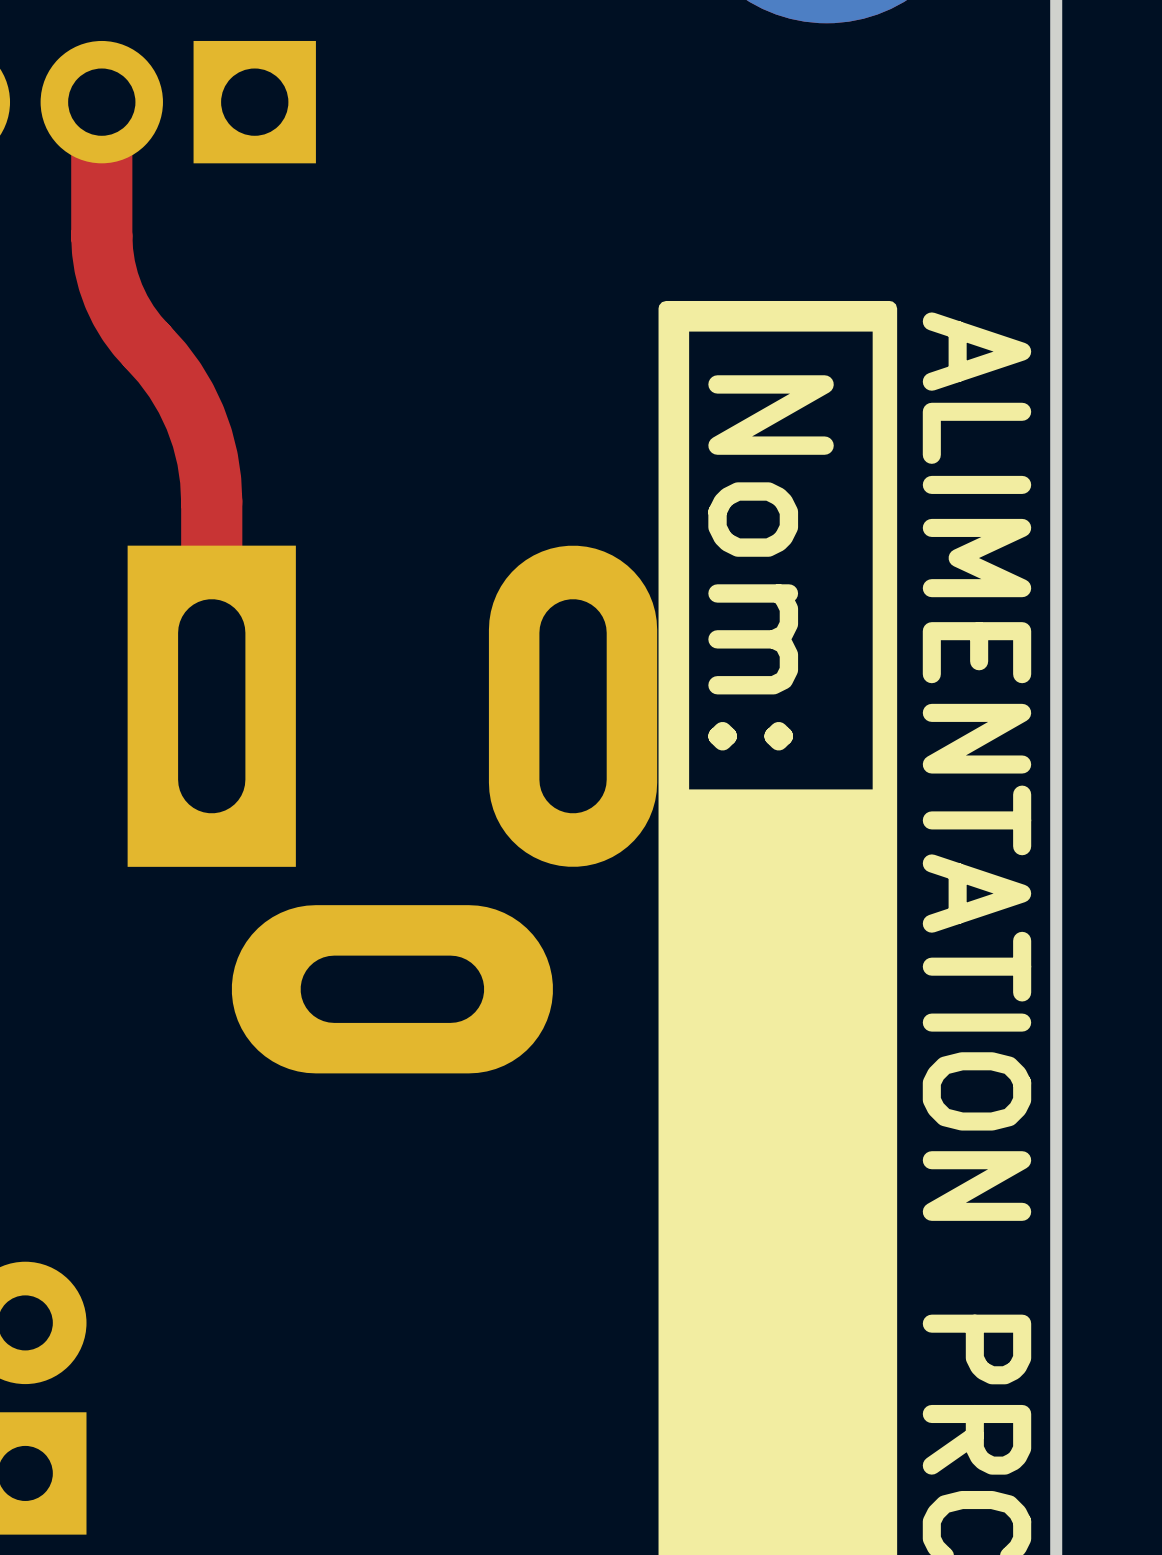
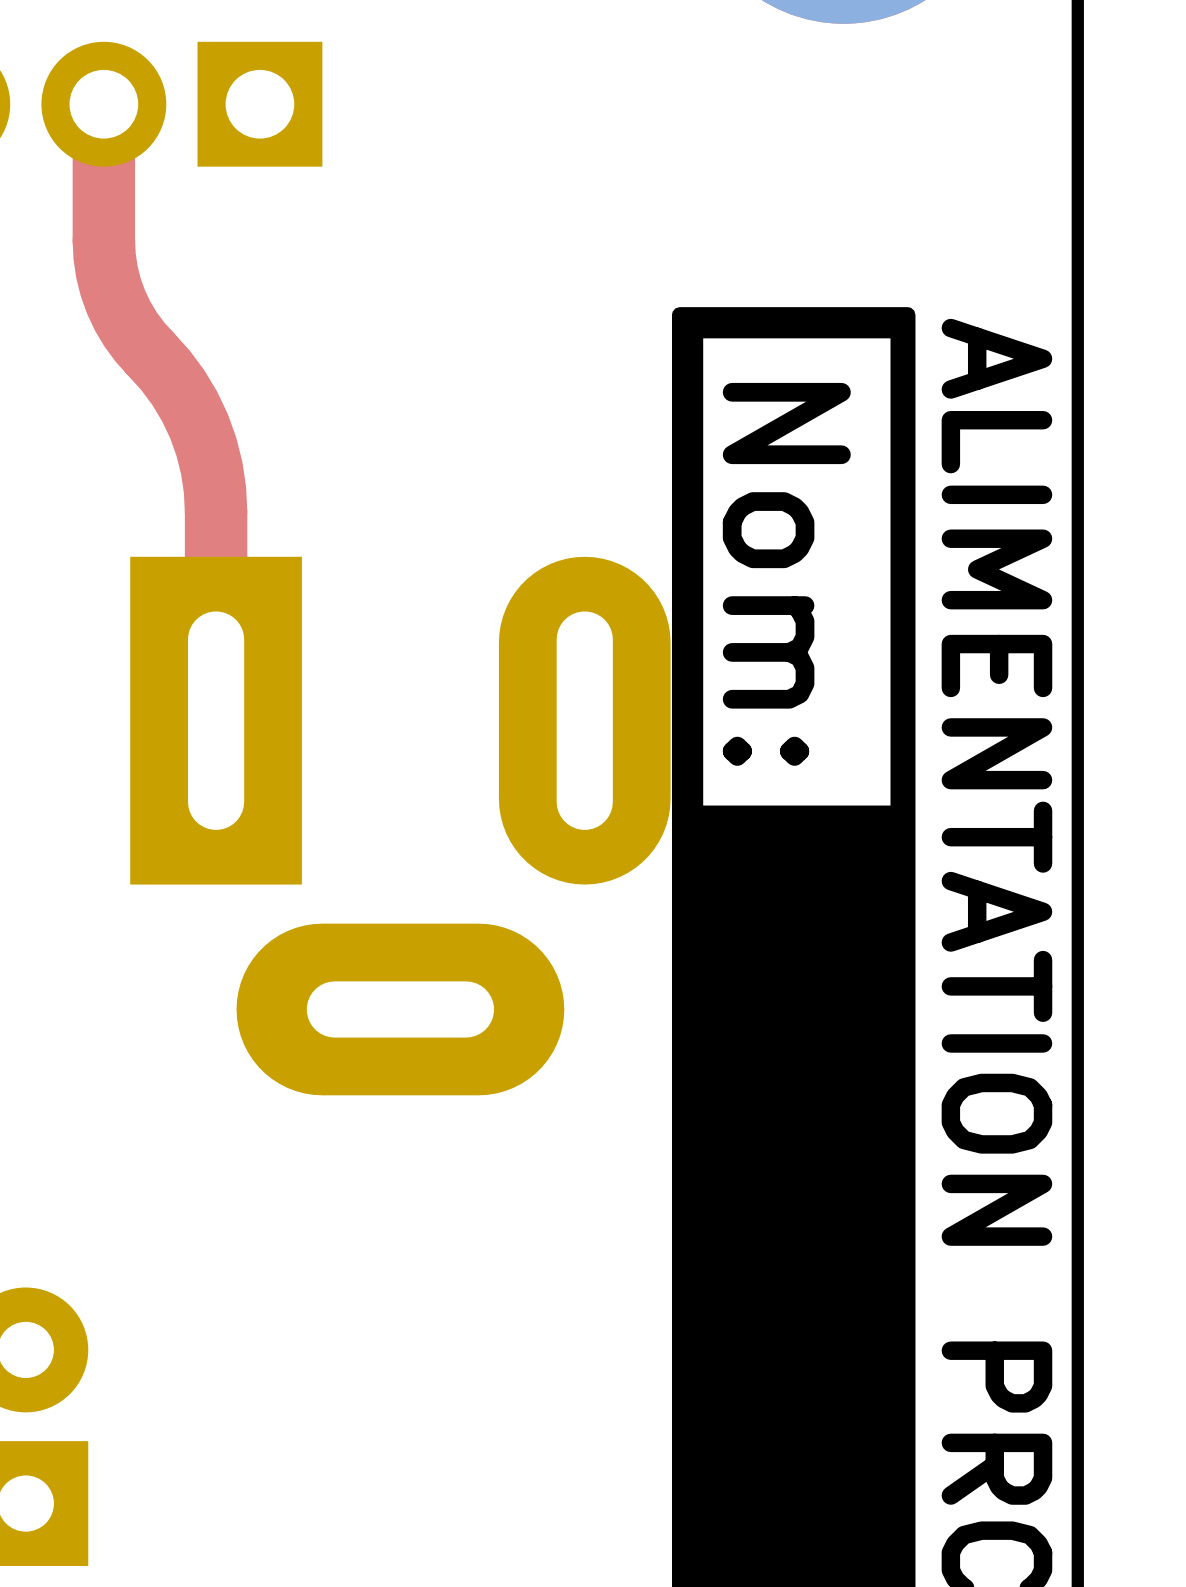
part footprint: [127, 545, 658, 1074] -> [130, 556, 671, 1096]

